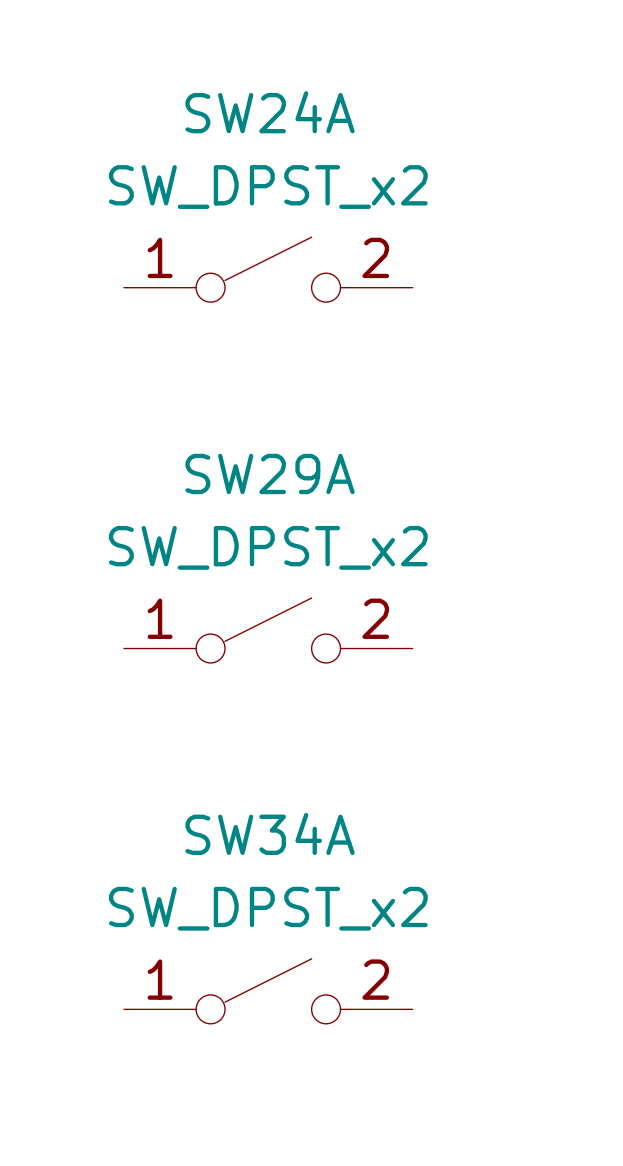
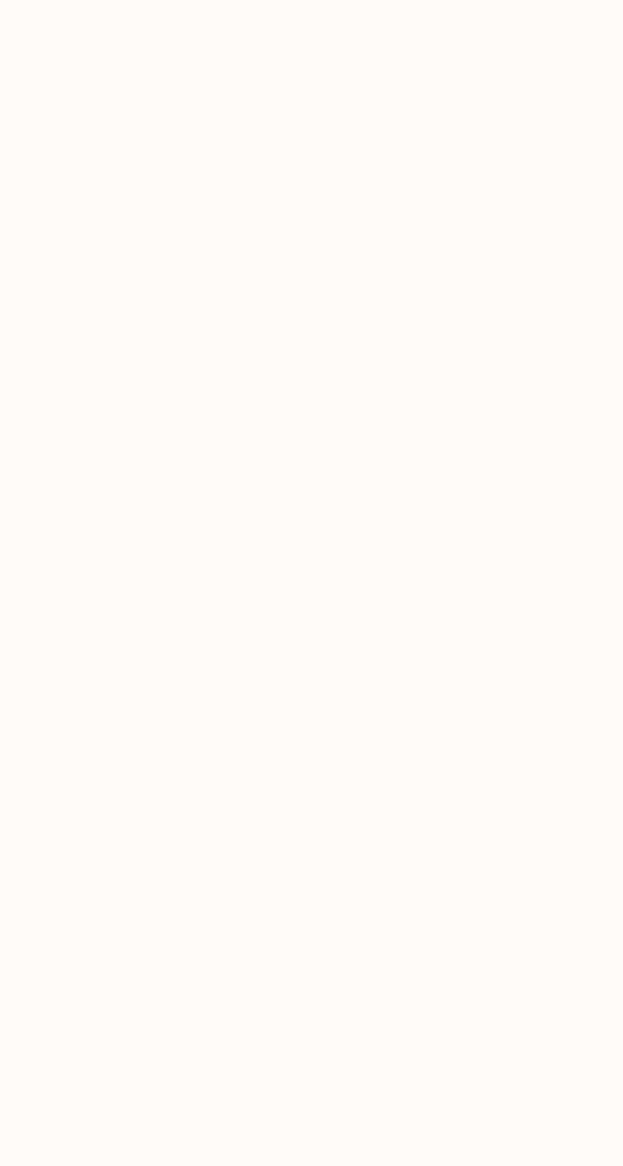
SW24A: SW_DPST_x2 (268, 269) -> none
SW29A: SW_DPST_x2 (268, 630) -> none
SW34A: SW_DPST_x2 (268, 991) -> none

